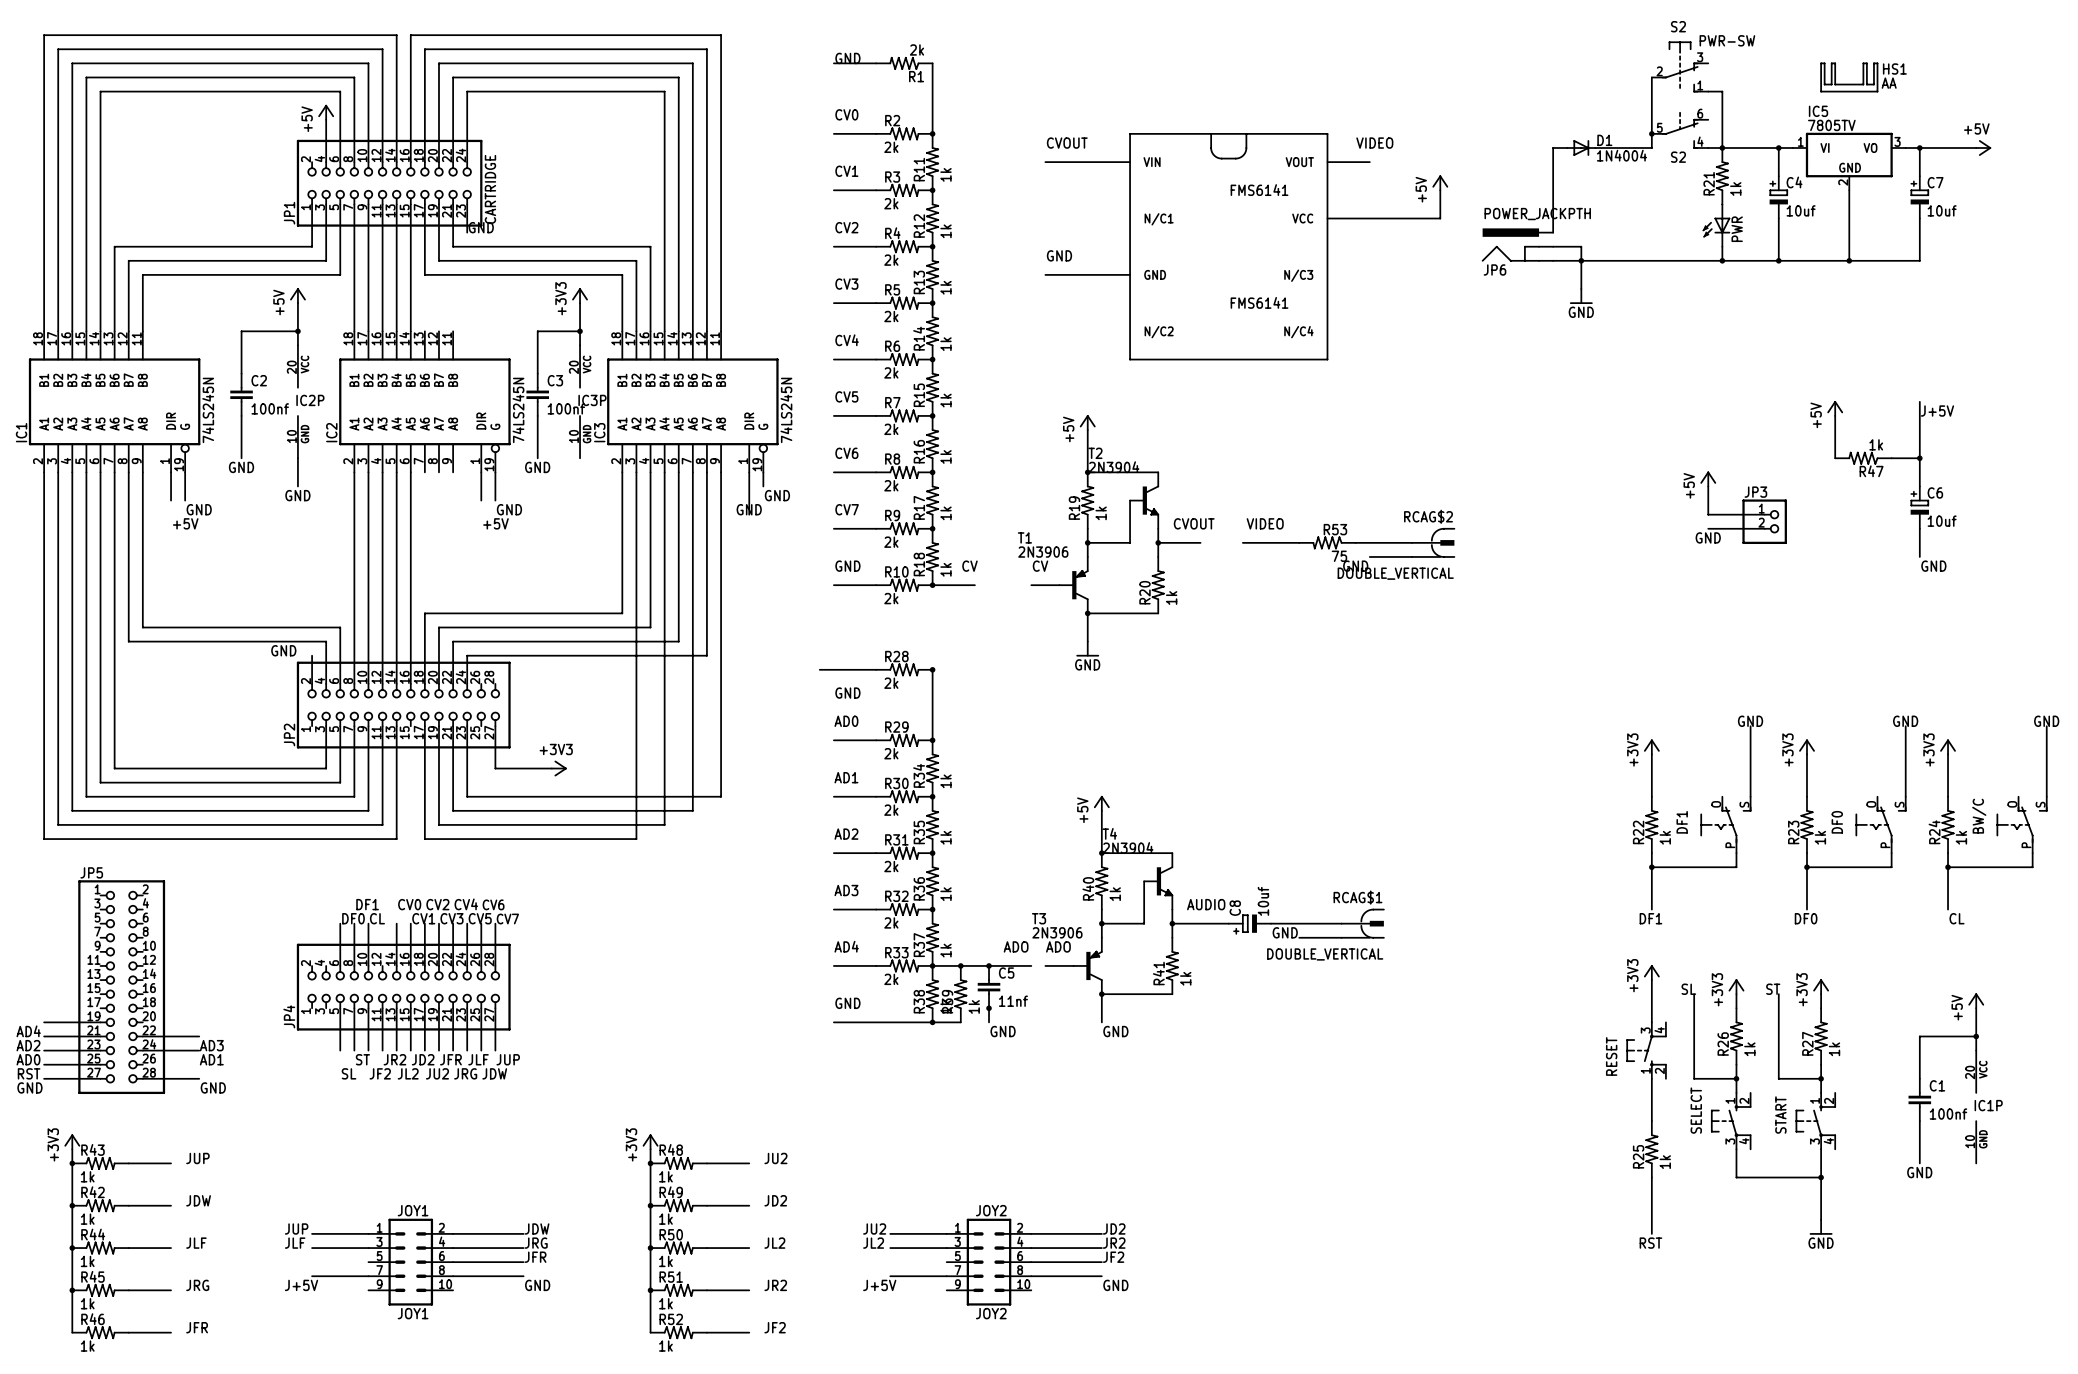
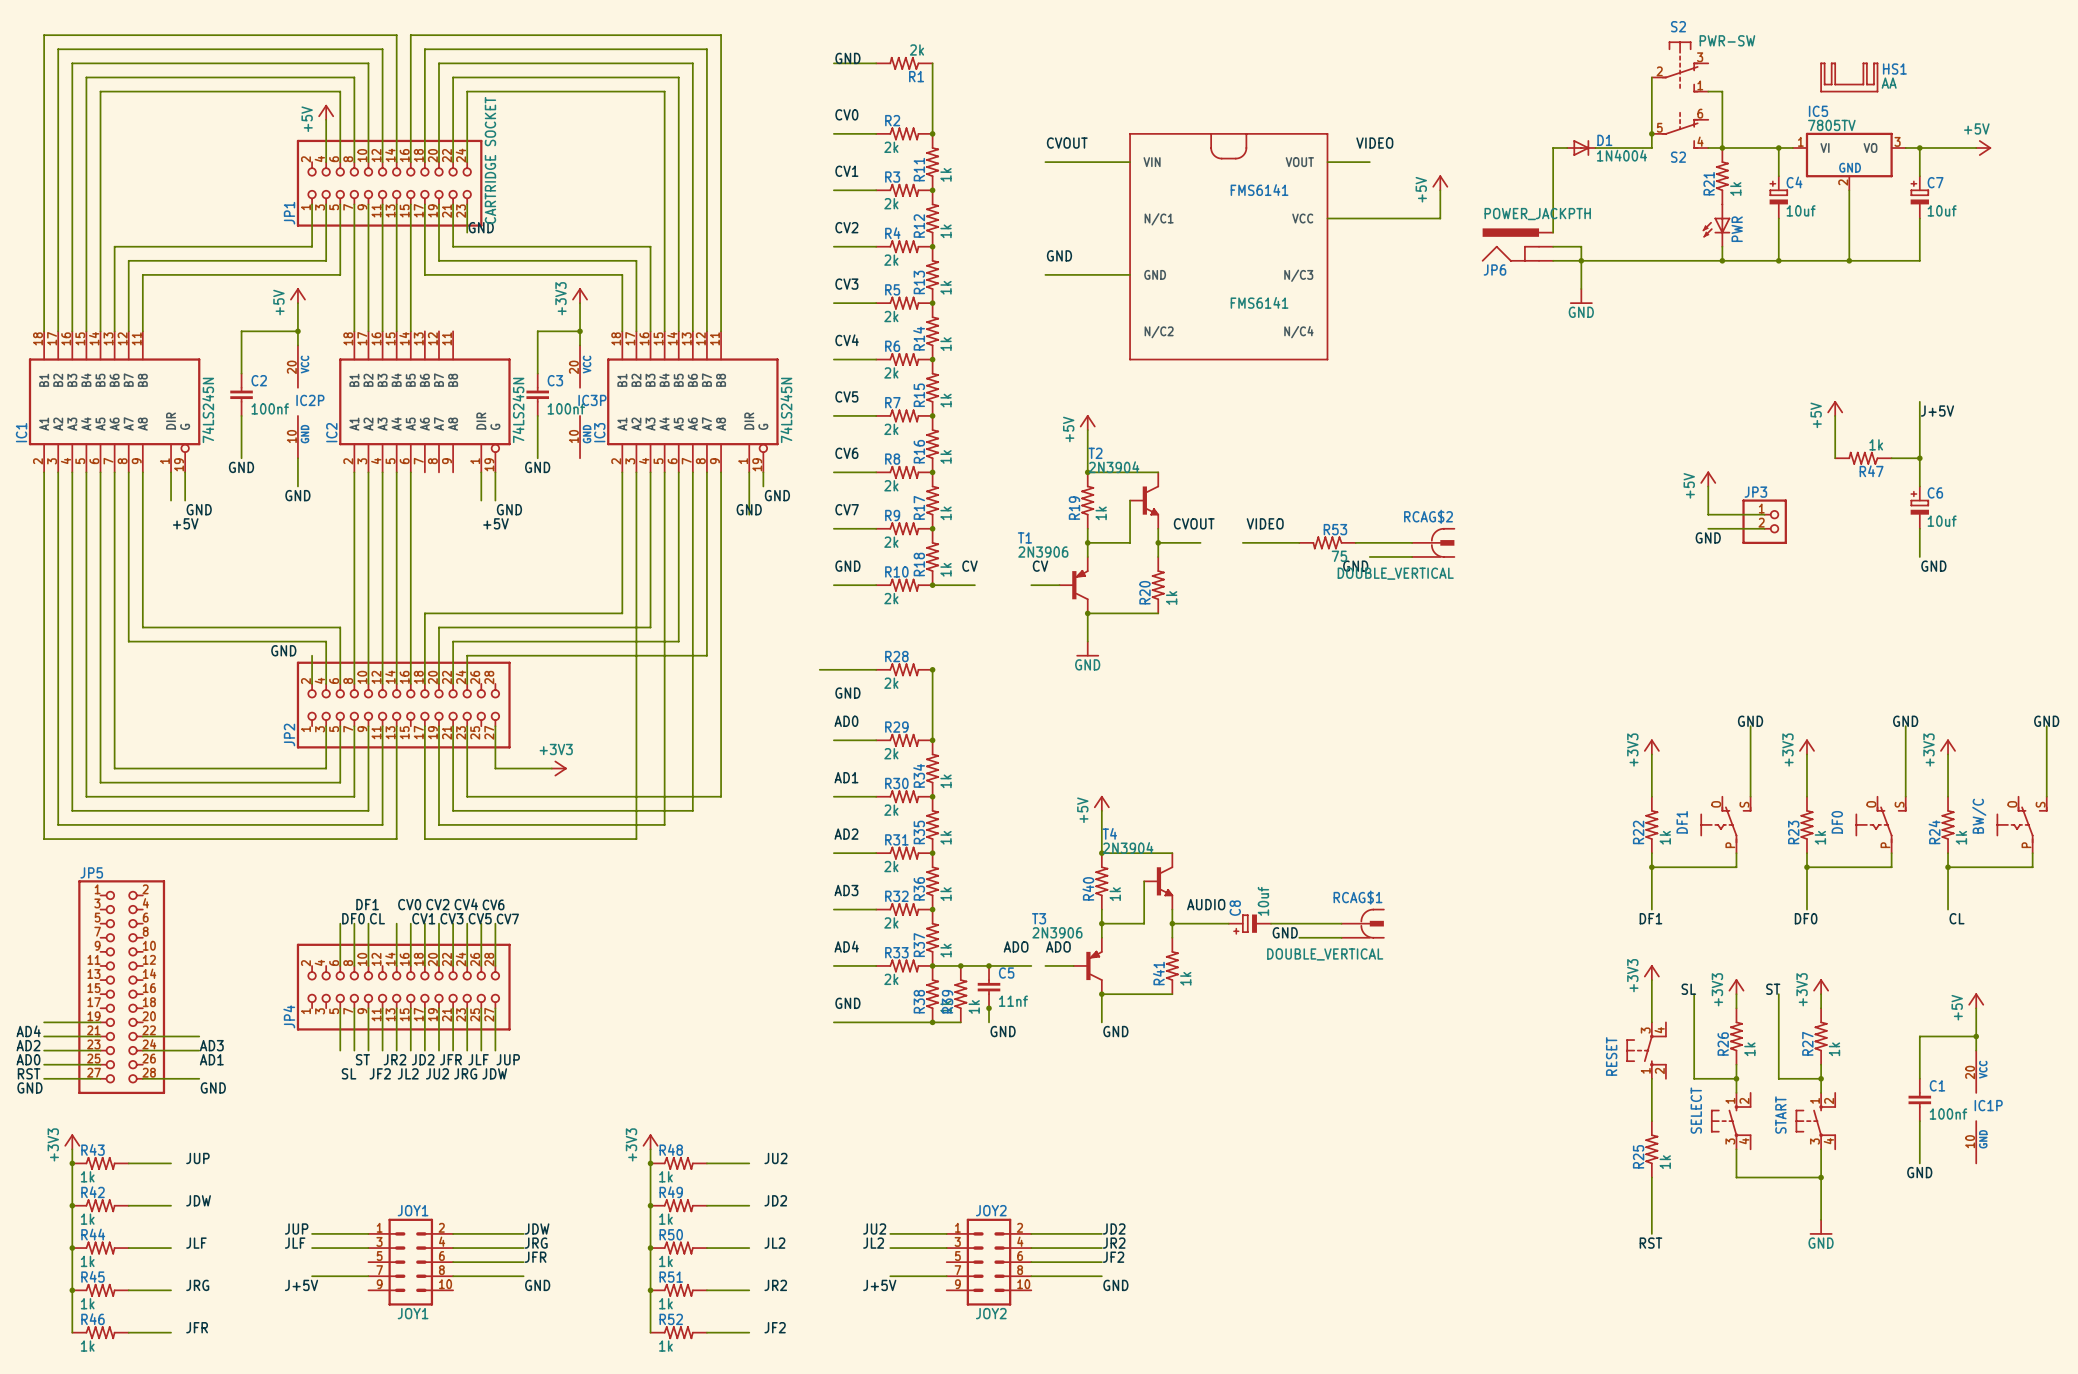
JP1 value: CARTRIDGE (490, 189) -> CARTRIDGE SOCKET (490, 160)

